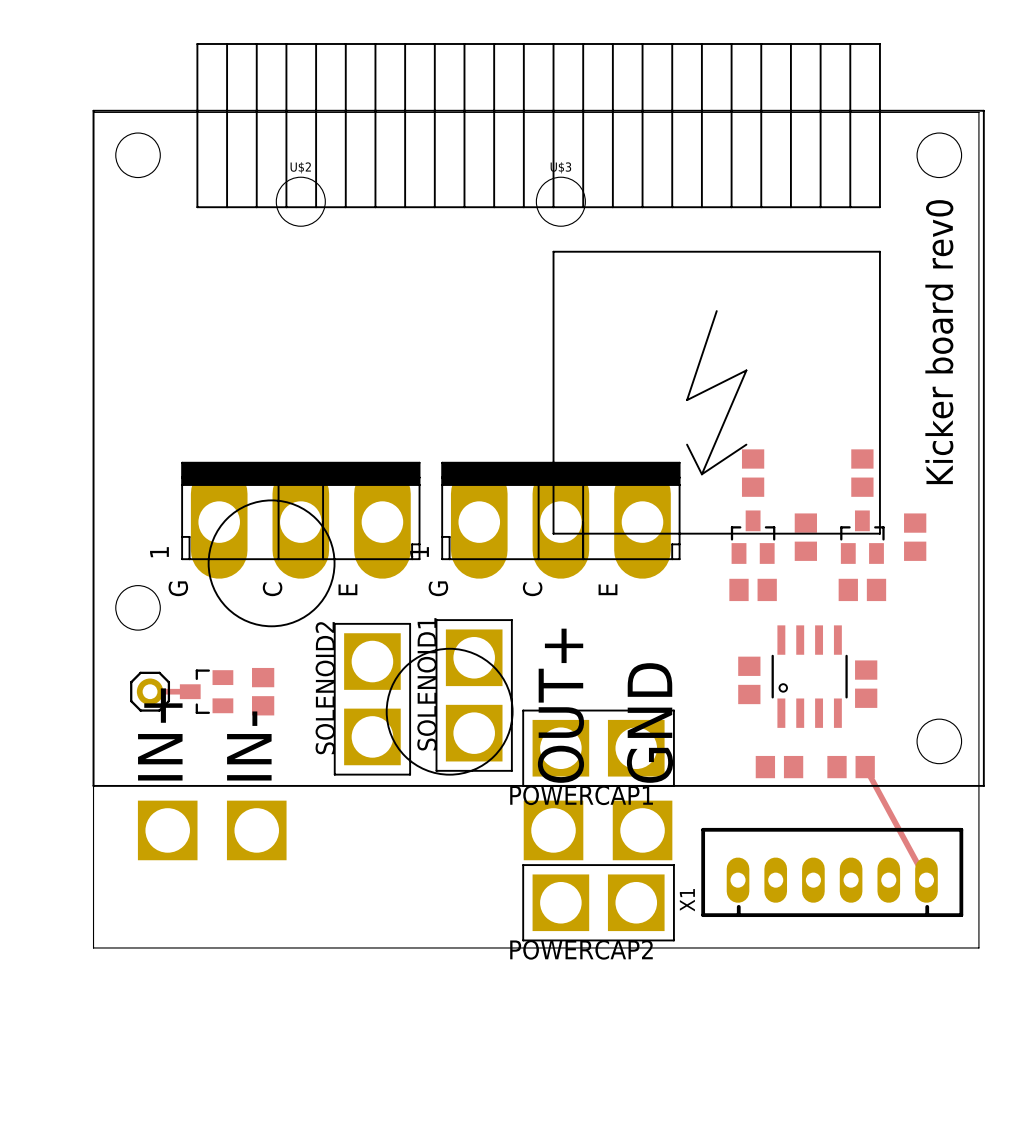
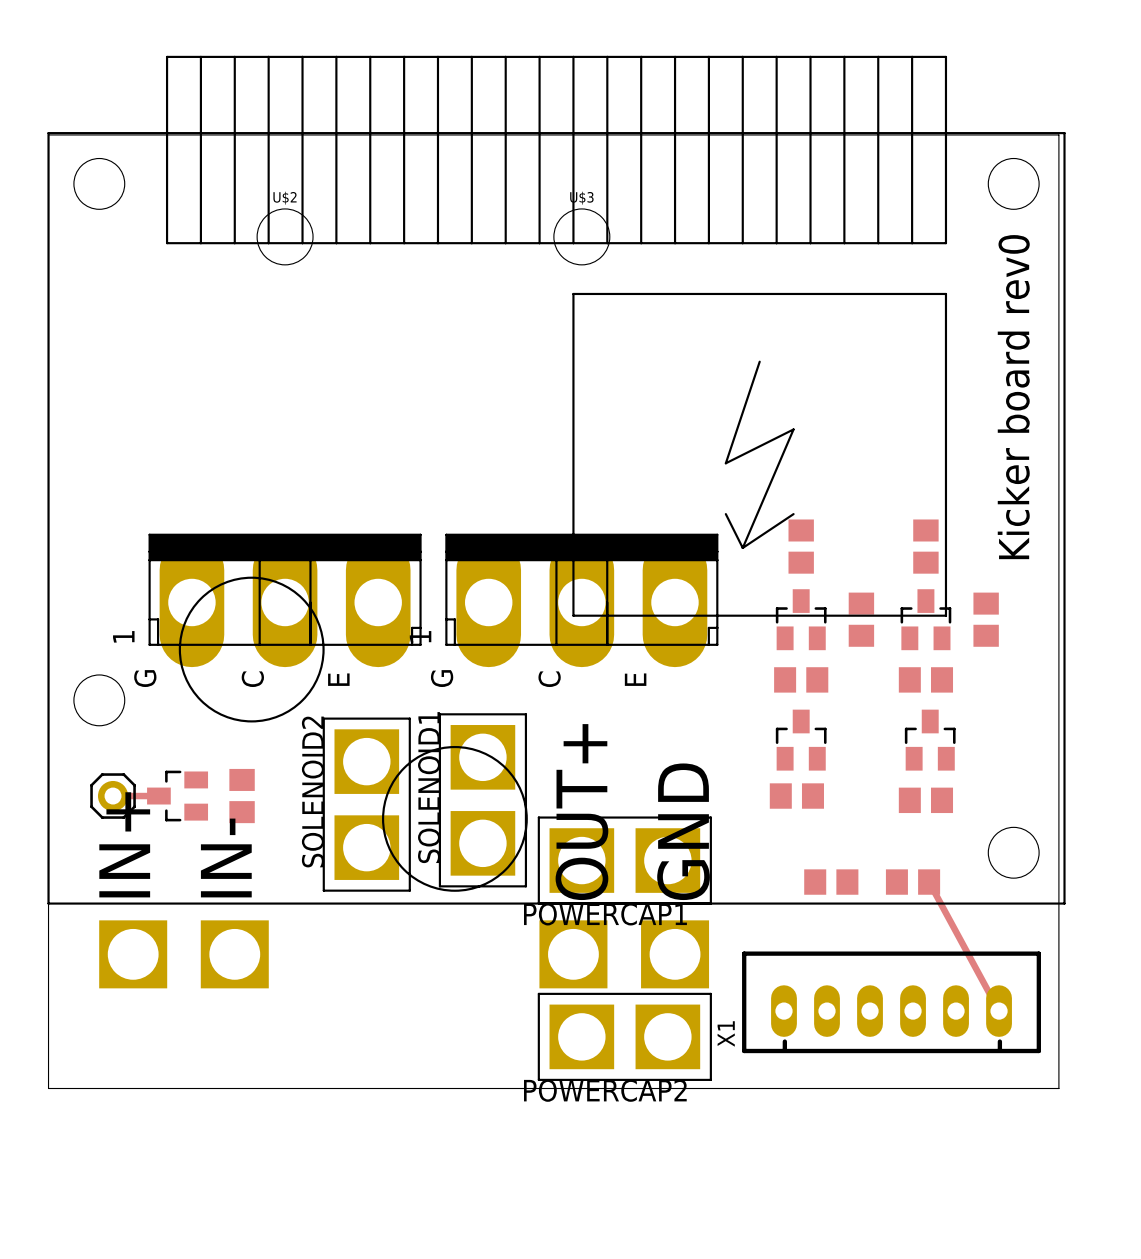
part: none -> (801, 740)
part: none -> (930, 740)
part: (809, 676) -> none
part rotation: 0° (749, 680) -> 90° clockwise (796, 796)
part rotation: 0° (866, 684) -> 90° clockwise (925, 800)

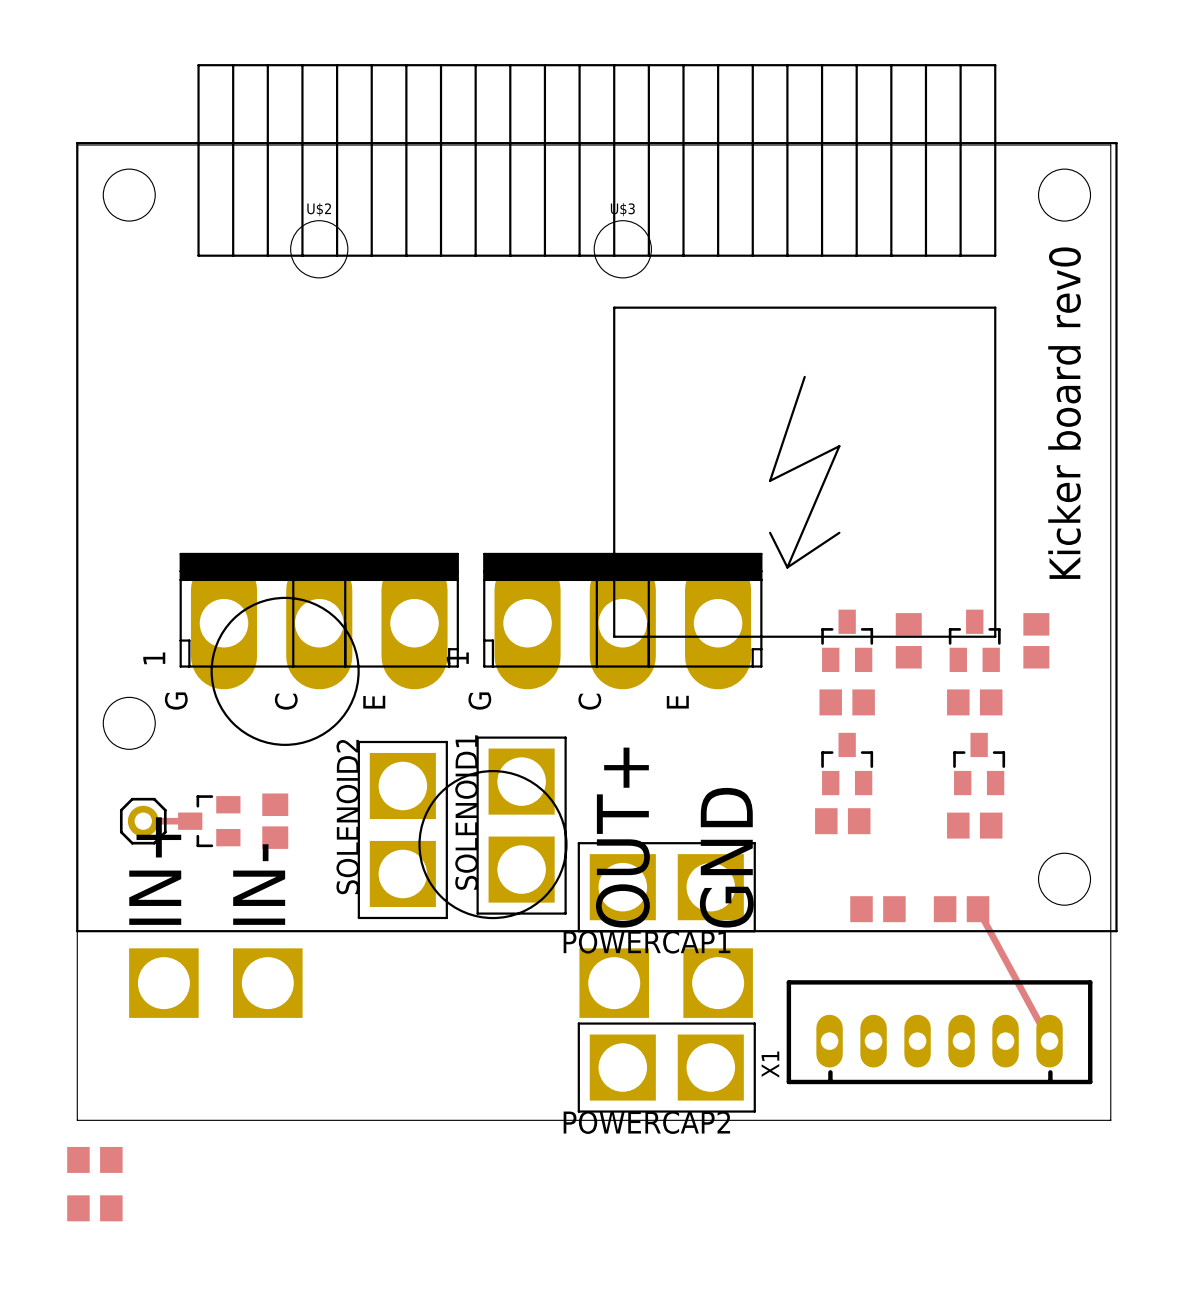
part: (801, 546) -> none
part: (925, 546) -> none
part: none -> (94, 1159)
part: none -> (94, 1208)

